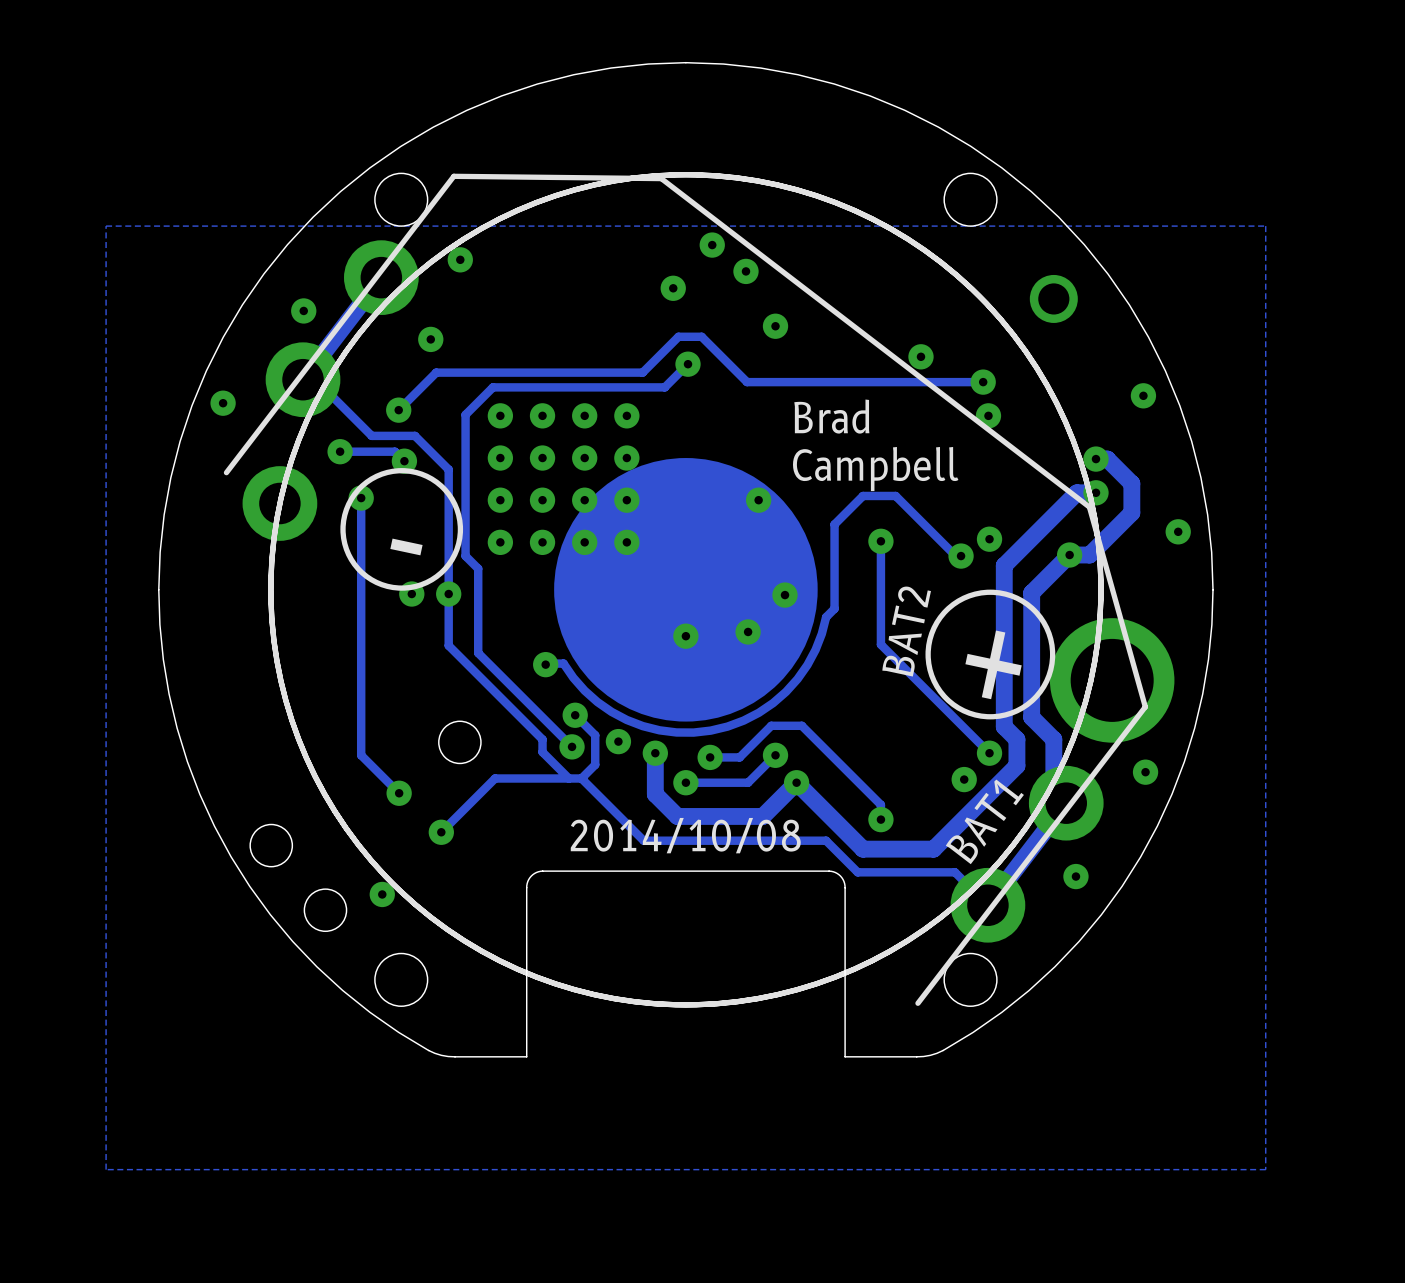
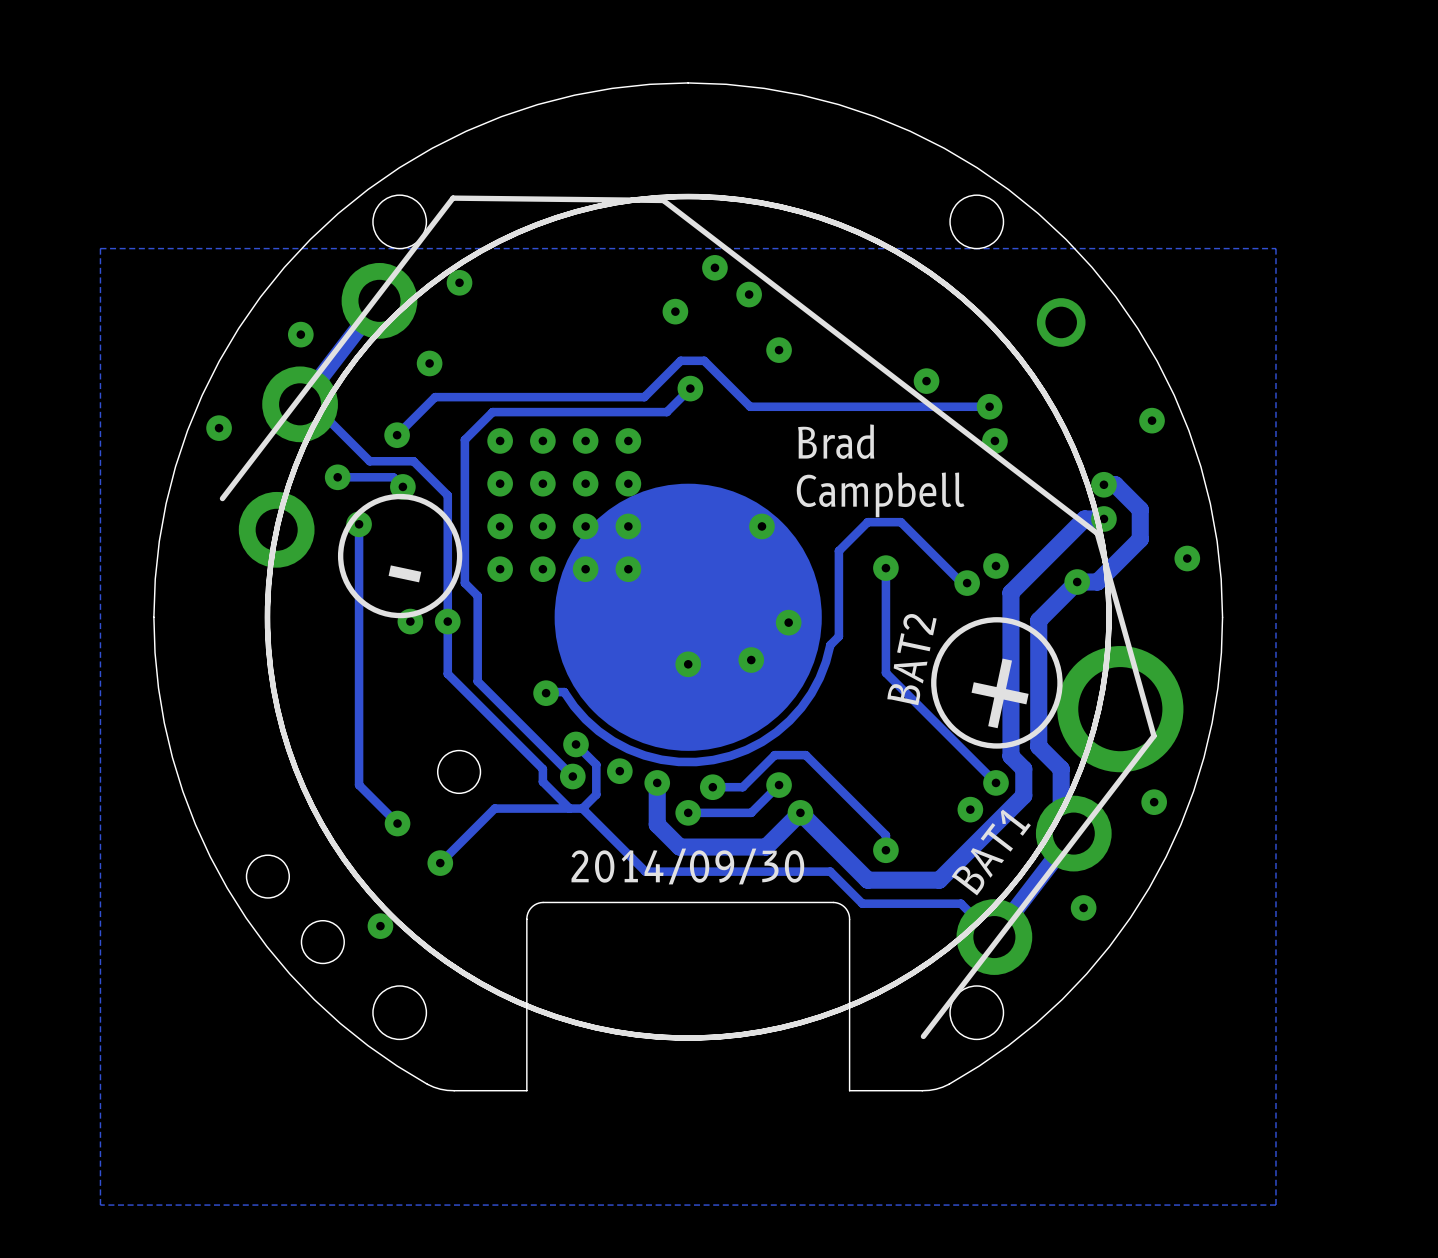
text: 2014/10/08 (685, 835) -> 2014/09/30 (687, 866)

